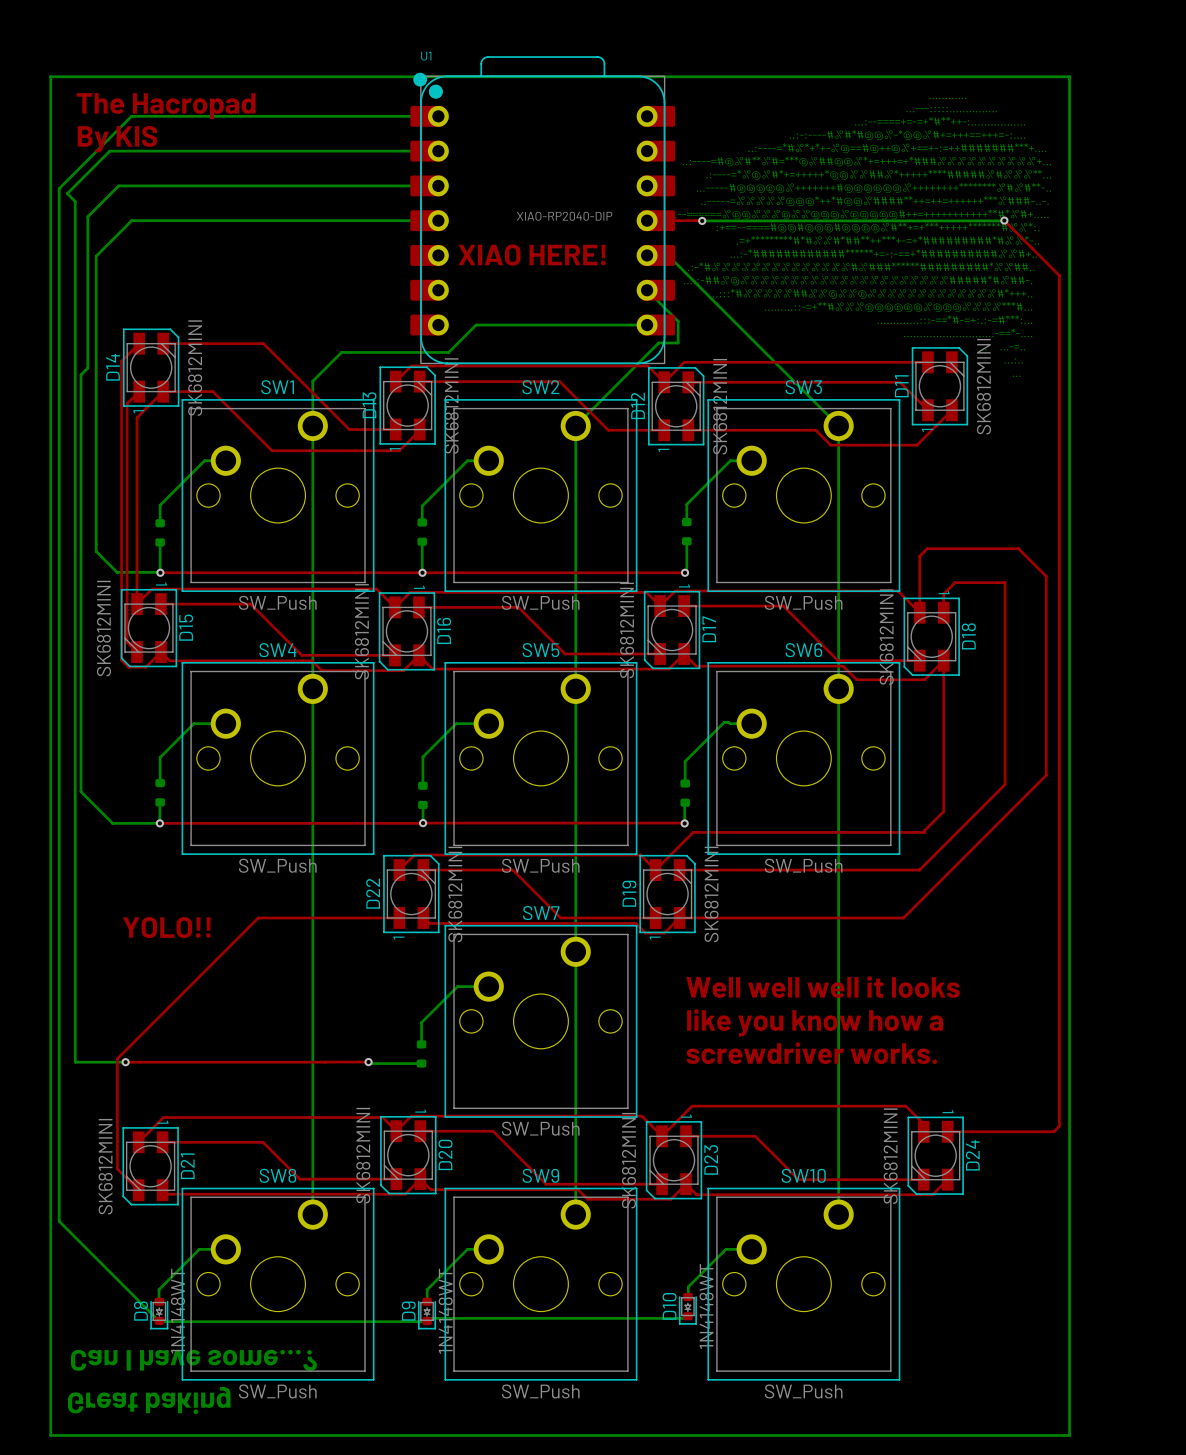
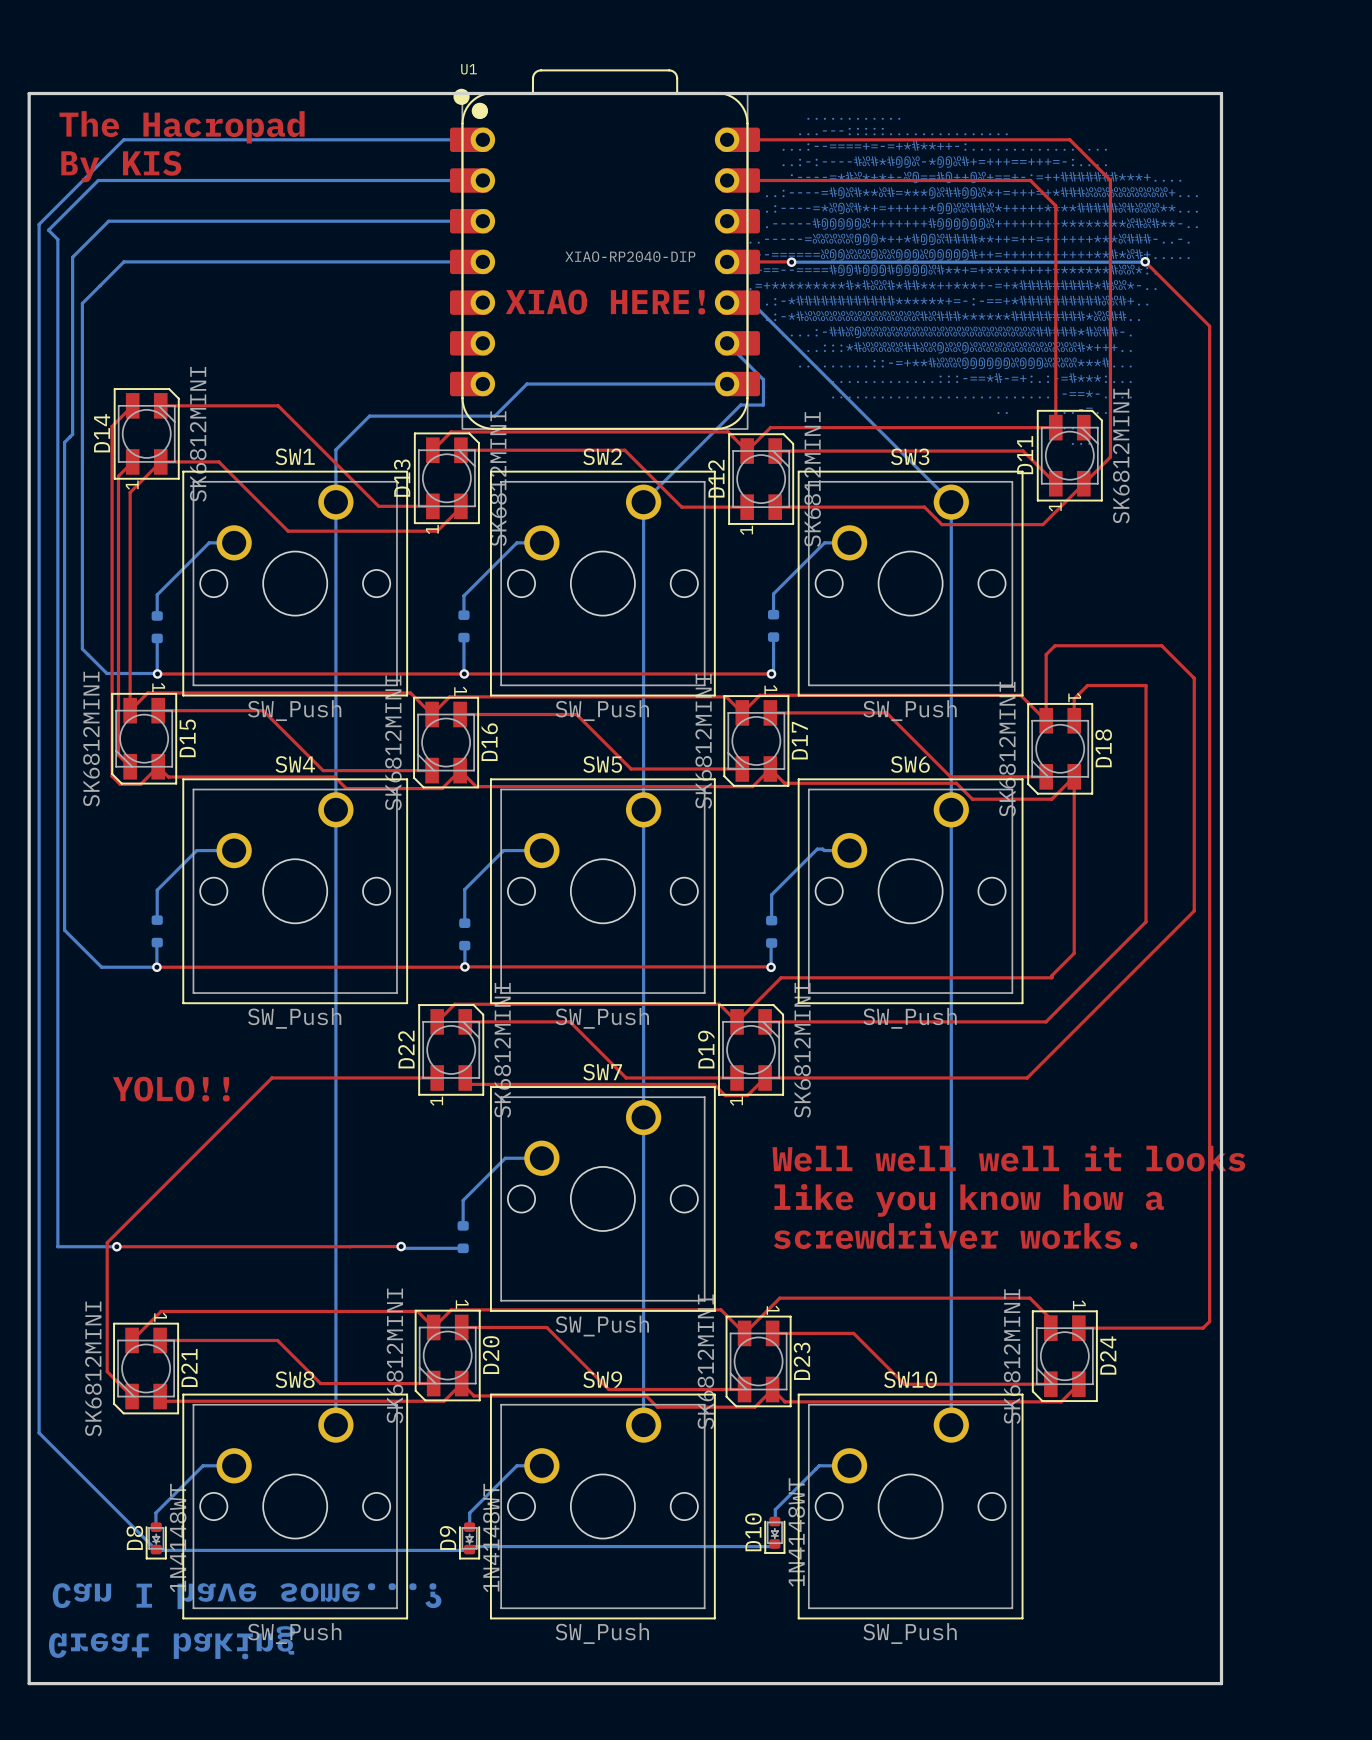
bottom track: (50, 76) (1069, 76) (1069, 1435) (50, 1435) (50, 76) -> none
board edge: none -> (29, 93) (1221, 93) (1221, 1683) (29, 1683) (29, 93)
top track: none -> (740, 139) (1069, 139) (1110, 180) (1110, 457) (1083, 483)
top track: none -> (740, 180) (1030, 180)
top track: none -> (1030, 180) (1055, 205) (1055, 427)

